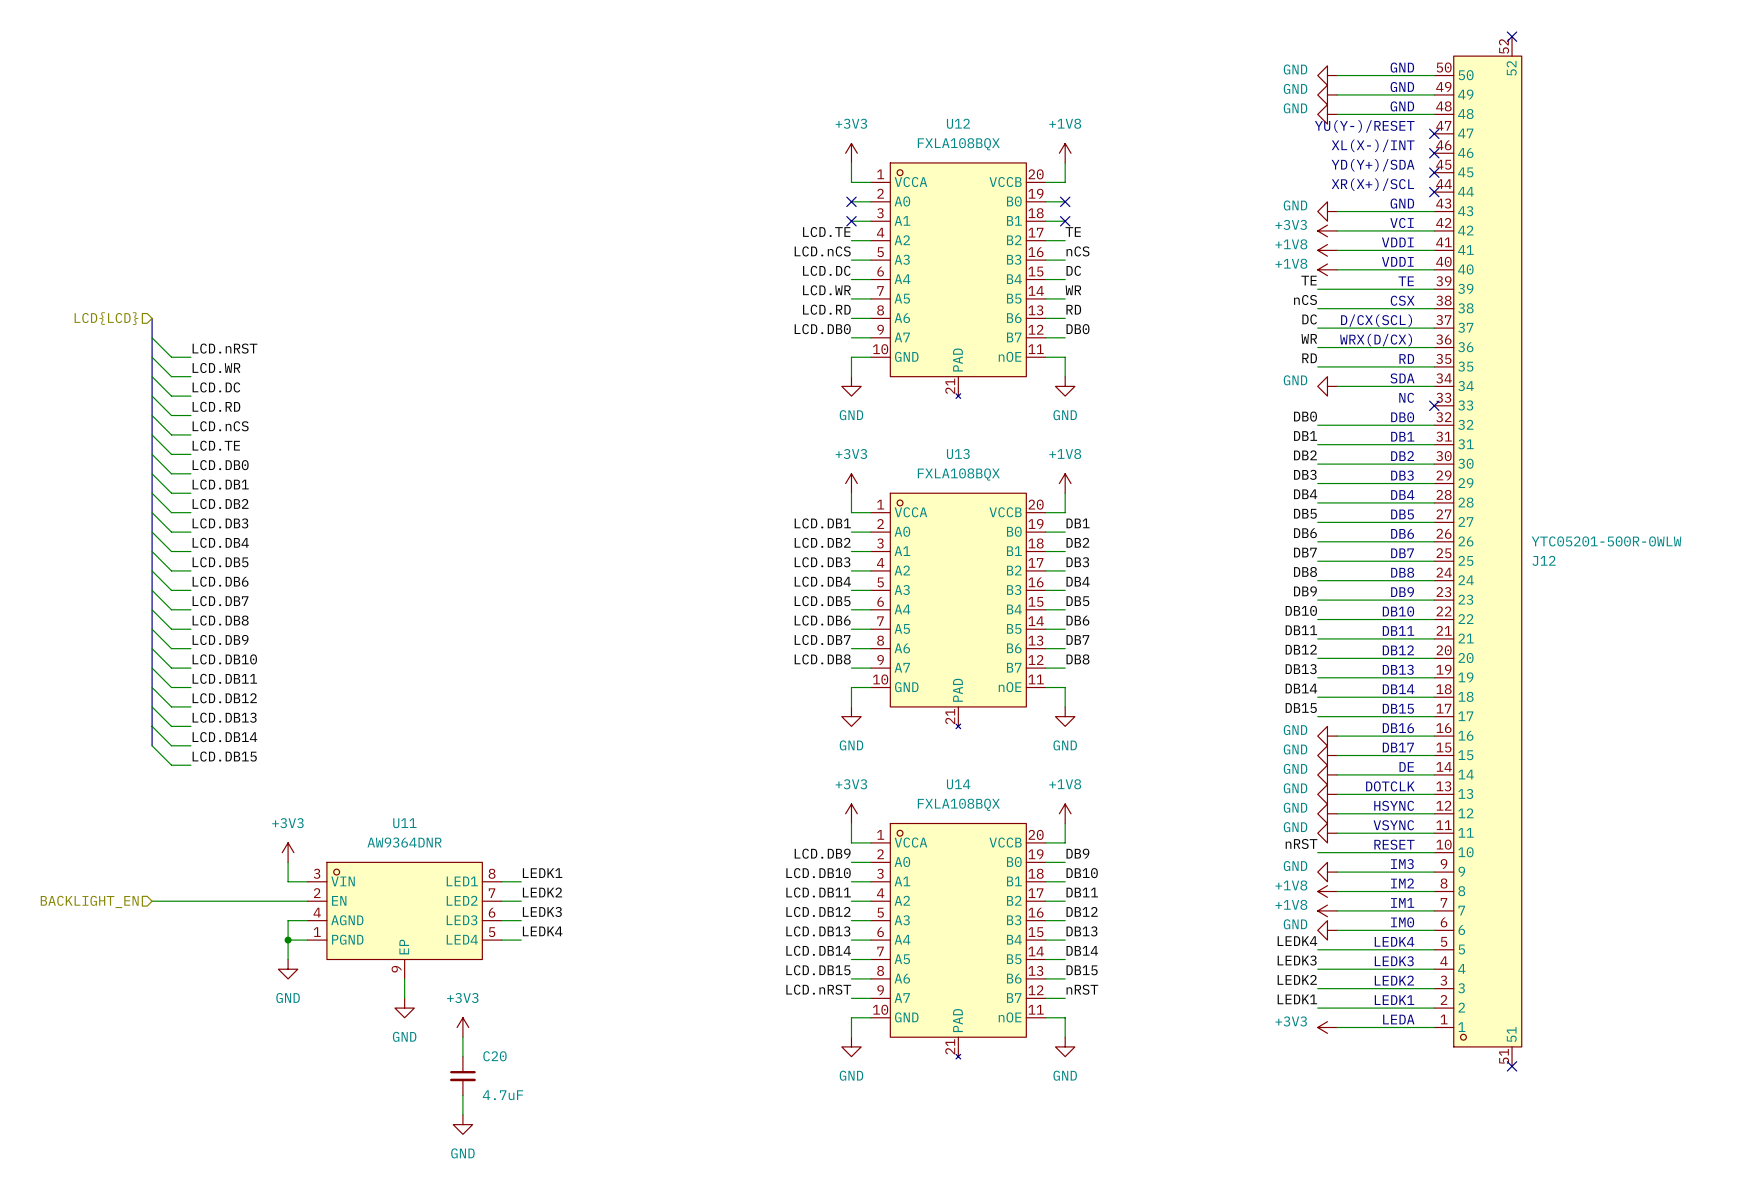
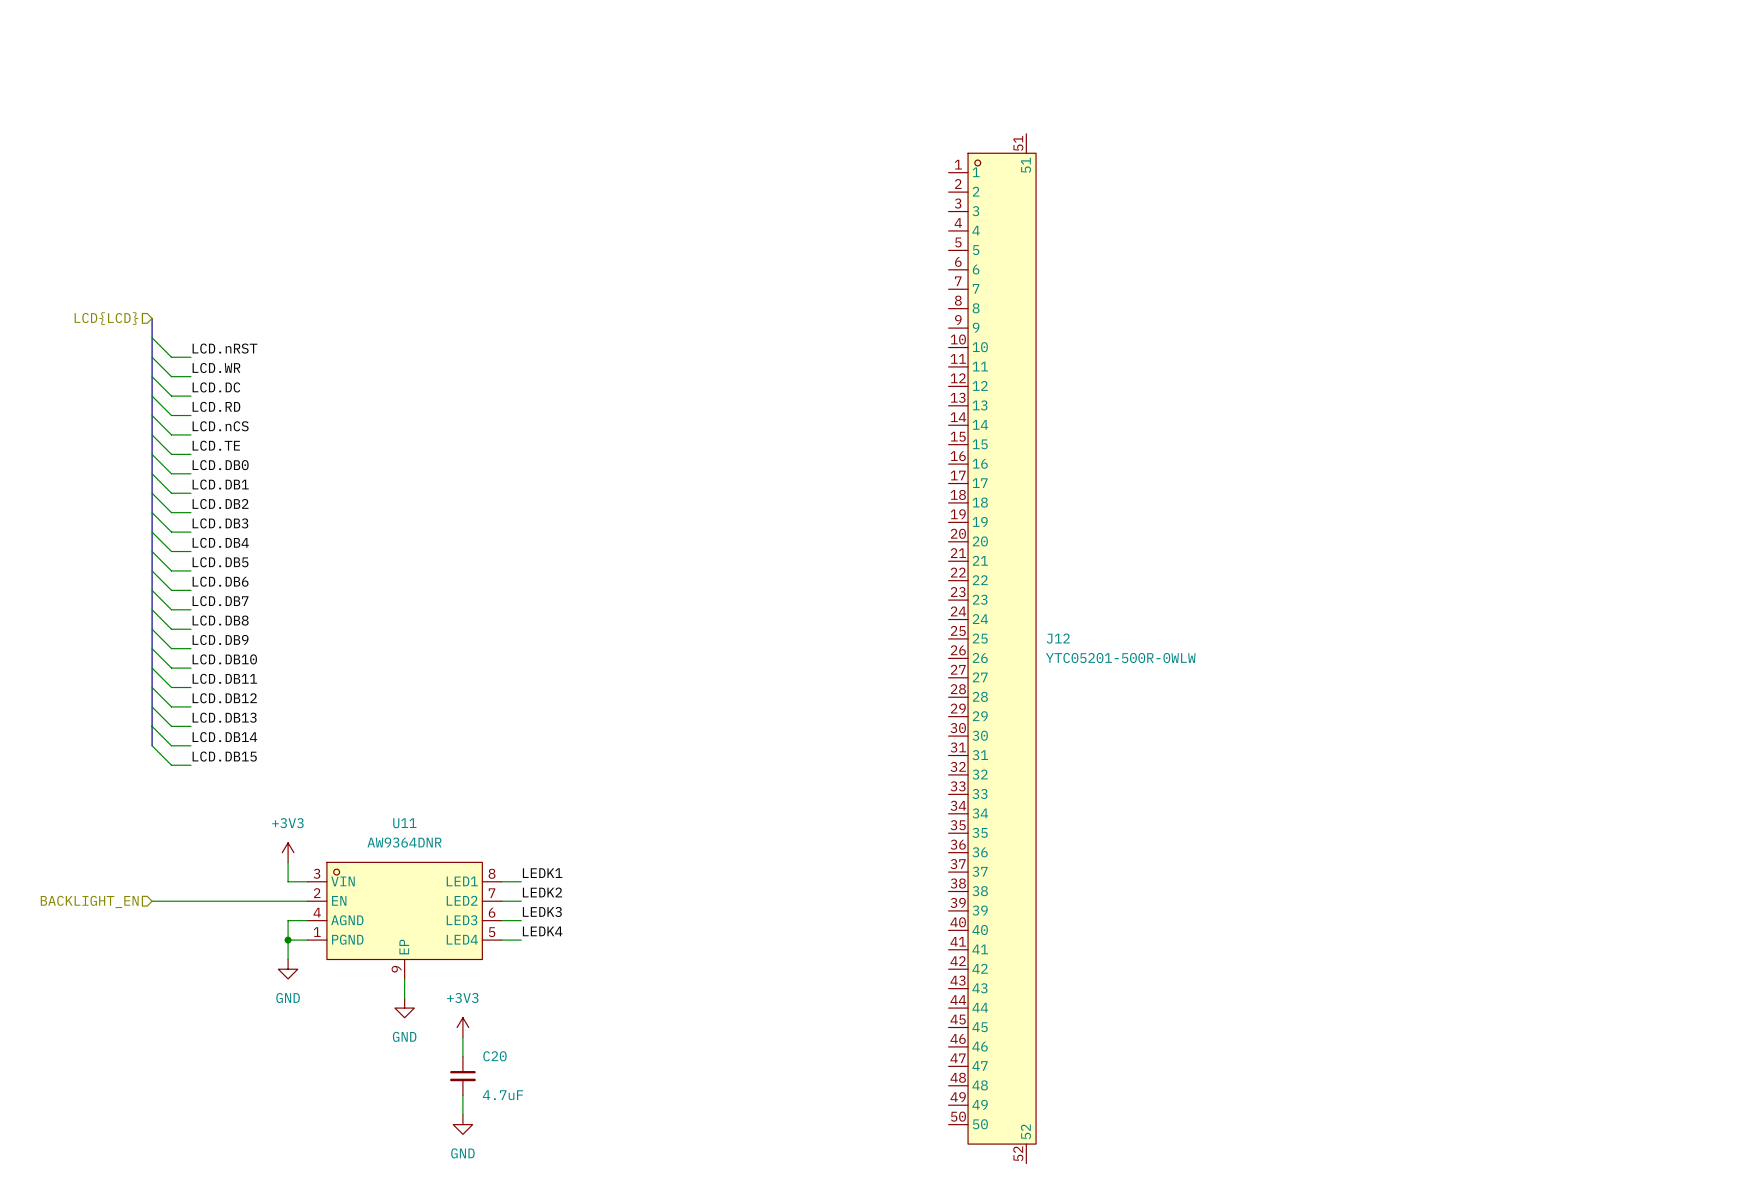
no-connect mark: (1512, 36) -> none
text: GND (1402, 67) -> none
power symbol: GND (1327, 75) -> none
wire: (1337, 75) (1434, 75) -> none
text: GND (1402, 87) -> none
power symbol: GND (1327, 94) -> none
wire: (1337, 94) (1434, 94) -> none
text: GND (1402, 106) -> none
power symbol: GND (1327, 114) -> none
wire: (1337, 114) (1434, 114) -> none
text: YU(Y-)/RESET (1364, 126) -> none
no-connect mark: (1434, 133) -> none
text: XL(X-)/INT (1373, 145) -> none
power symbol: +3V3 (851, 153) -> none
power symbol: +1V8 (1065, 153) -> none
no-connect mark: (1434, 153) -> none
wire: (851, 162) (851, 182) (870, 182) -> none
wire: (1065, 162) (1065, 182) (1045, 182) -> none
text: YD(Y+)/SDA (1373, 165) -> none
no-connect mark: (1434, 172) -> none
text: XR(X+)/SCL (1372, 184) -> none
no-connect mark: (1434, 192) -> none
wire: (851, 201) (870, 201) -> none
no-connect mark: (851, 201) -> none
wire: (1045, 201) (1065, 201) -> none
no-connect mark: (1065, 201) -> none
text: GND (1402, 203) -> none
power symbol: GND (1327, 211) -> none
wire: (1337, 211) (1434, 211) -> none
wire: (851, 221) (870, 221) -> none
no-connect mark: (851, 221) -> none
wire: (1045, 221) (1065, 221) -> none
no-connect mark: (1065, 221) -> none
text: VCI (1402, 223) -> none
power symbol: +3V3 (1327, 230) -> none
wire: (1337, 230) (1434, 230) -> none
label: LCD.TE (826, 232) -> none
label: TE (1073, 232) -> none
wire: (851, 240) (870, 240) -> none
wire: (1045, 240) (1065, 240) -> none
text: VDDI (1397, 242) -> none
power symbol: +1V8 (1327, 250) -> none
wire: (1337, 250) (1434, 250) -> none
label: LCD.nCS (822, 251) -> none
label: nCS (1077, 251) -> none
wire: (851, 260) (870, 260) -> none
wire: (1045, 260) (1065, 260) -> none
text: VDDI (1397, 261) -> none
power symbol: +1V8 (1327, 269) -> none
wire: (1337, 269) (1434, 269) -> none
label: LCD.DC (826, 270) -> none
label: DC (1073, 270) -> none
wire: (851, 279) (870, 279) -> none
wire: (1045, 279) (1065, 279) -> none
U12: FXLA108BQX (958, 280) -> none
label: TE (1309, 280) -> none
text: TE (1406, 281) -> none
wire: (1317, 289) (1434, 289) -> none
label: LCD.WR (826, 290) -> none
label: WR (1073, 290) -> none
wire: (851, 298) (870, 298) -> none
wire: (1045, 298) (1065, 298) -> none
label: nCS (1305, 300) -> none
text: CSX (1402, 300) -> none
wire: (1317, 308) (1434, 308) -> none
label: LCD.RD (826, 309) -> none
label: RD (1073, 309) -> none
wire: (851, 318) (870, 318) -> none
wire: (1045, 318) (1065, 318) -> none
label: DC (1309, 319) -> none
text: D/CX(SCL) (1376, 320) -> none
wire: (1317, 328) (1434, 328) -> none
label: LCD.DB0 (822, 329) -> none
label: DB0 (1077, 329) -> none
wire: (851, 337) (870, 337) -> none
wire: (1045, 337) (1065, 337) -> none
label: WR (1309, 338) -> none
text: WRX(D/CX) (1376, 340) -> none
wire: (1317, 347) (1434, 347) -> none
wire: (870, 357) (851, 357) (851, 376) -> none
wire: (1045, 357) (1065, 357) (1065, 376) -> none
label: RD (1309, 358) -> none
text: RD (1406, 359) -> none
wire: (1317, 366) (1434, 366) -> none
text: SDA (1402, 378) -> none
power symbol: GND (851, 386) -> none
power symbol: GND (1065, 386) -> none
power symbol: GND (1327, 386) -> none
wire: (1337, 386) (1434, 386) -> none
text: NC (1406, 397) -> none
no-connect mark: (1434, 405) -> none
label: DB0 (1305, 416) -> none
text: DB0 (1402, 417) -> none
wire: (1317, 425) (1434, 425) -> none
label: DB1 (1305, 436) -> none
text: DB1 (1402, 436) -> none
wire: (1317, 444) (1434, 444) -> none
label: DB2 (1305, 455) -> none
text: DB2 (1402, 456) -> none
wire: (1317, 464) (1434, 464) -> none
label: DB3 (1305, 474) -> none
text: DB3 (1402, 475) -> none
power symbol: +3V3 (851, 483) -> none
power symbol: +1V8 (1065, 483) -> none
wire: (1317, 483) (1434, 483) -> none
wire: (851, 493) (851, 512) (870, 512) -> none
wire: (1065, 493) (1065, 512) (1045, 512) -> none
label: DB4 (1305, 494) -> none
text: DB4 (1402, 494) -> none
wire: (1317, 502) (1434, 502) -> none
label: DB5 (1305, 513) -> none
text: DB5 (1402, 514) -> none
wire: (1317, 522) (1434, 522) -> none
label: LCD.DB1 (822, 523) -> none
label: DB1 (1078, 523) -> none
wire: (851, 532) (870, 532) -> none
wire: (1045, 532) (1065, 532) -> none
label: DB6 (1305, 533) -> none
text: DB6 (1402, 533) -> none
wire: (1317, 541) (1434, 541) -> none
label: LCD.DB2 (822, 542) -> none
label: DB2 (1077, 542) -> none
wire: (851, 551) (870, 551) -> none
wire: (1045, 551) (1065, 551) -> none
J12 flip: as is (1487, 551) -> up-down (1002, 648)
label: DB7 (1305, 552) -> none
text: DB7 (1402, 553) -> none
wire: (1317, 561) (1434, 561) -> none
label: LCD.DB3 (822, 562) -> none
label: DB3 (1077, 562) -> none
wire: (851, 570) (870, 570) -> none
wire: (1045, 570) (1065, 570) -> none
label: DB8 (1305, 571) -> none
text: DB8 (1402, 572) -> none
wire: (1317, 580) (1434, 580) -> none
label: LCD.DB4 (822, 581) -> none
label: DB4 (1078, 581) -> none
wire: (851, 590) (870, 590) -> none
wire: (1045, 590) (1065, 590) -> none
label: DB9 (1305, 591) -> none
text: DB9 (1402, 592) -> none
wire: (1317, 600) (1434, 600) -> none
label: LCD.DB5 (822, 601) -> none
label: DB5 (1077, 601) -> none
wire: (851, 609) (870, 609) -> none
wire: (1045, 609) (1065, 609) -> none
U13: FXLA108BQX (958, 610) -> none
label: DB10 (1301, 610) -> none
text: DB10 (1398, 611) -> none
wire: (1317, 619) (1434, 619) -> none
label: LCD.DB6 (822, 620) -> none
label: DB6 (1077, 620) -> none
wire: (851, 629) (870, 629) -> none
wire: (1045, 629) (1065, 629) -> none
label: DB11 (1301, 630) -> none
text: DB11 (1398, 630) -> none
wire: (1317, 638) (1434, 638) -> none
label: LCD.DB7 (822, 639) -> none
label: DB7 (1077, 639) -> none
wire: (851, 648) (870, 648) -> none
wire: (1045, 648) (1065, 648) -> none
label: DB12 (1301, 649) -> none
text: DB12 (1398, 650) -> none
wire: (1317, 658) (1434, 658) -> none
label: LCD.DB8 (822, 659) -> none
label: DB8 (1077, 659) -> none
wire: (851, 668) (870, 668) -> none
wire: (1045, 668) (1065, 668) -> none
label: DB13 (1301, 669) -> none
text: DB13 (1398, 669) -> none
wire: (1317, 677) (1434, 677) -> none
wire: (870, 687) (851, 687) (851, 706) -> none
wire: (1045, 687) (1065, 687) (1065, 706) -> none
label: DB14 (1301, 688) -> none
text: DB14 (1398, 689) -> none
wire: (1317, 697) (1434, 697) -> none
label: DB15 (1301, 708) -> none
text: DB15 (1398, 708) -> none
power symbol: GND (851, 716) -> none
power symbol: GND (1065, 716) -> none
wire: (1317, 716) (1434, 716) -> none
text: DB16 (1398, 728) -> none
power symbol: GND (1327, 736) -> none
wire: (1337, 736) (1434, 736) -> none
text: DB17 (1398, 747) -> none
power symbol: GND (1327, 755) -> none
wire: (1337, 755) (1434, 755) -> none
text: DE (1406, 766) -> none
power symbol: GND (1327, 774) -> none
wire: (1337, 774) (1434, 774) -> none
text: DOTCLK (1390, 786) -> none
power symbol: GND (1327, 794) -> none
wire: (1337, 794) (1434, 794) -> none
text: HSYNC (1394, 805) -> none
power symbol: +3V3 (851, 813) -> none
power symbol: +1V8 (1065, 813) -> none
power symbol: GND (1327, 813) -> none
wire: (1337, 813) (1434, 813) -> none
wire: (851, 823) (851, 842) (870, 842) -> none
wire: (1065, 823) (1065, 842) (1045, 842) -> none
text: VSYNC (1393, 825) -> none
power symbol: GND (1327, 833) -> none
wire: (1337, 833) (1434, 833) -> none
label: nRST (1301, 843) -> none
text: RESET (1394, 844) -> none
wire: (1317, 852) (1434, 852) -> none
label: LCD.DB9 (822, 853) -> none
label: DB9 (1077, 853) -> none
wire: (851, 862) (870, 862) -> none
wire: (1045, 862) (1065, 862) -> none
text: IM3 (1402, 864) -> none
power symbol: GND (1327, 872) -> none
wire: (1337, 872) (1434, 872) -> none
label: LCD.DB10 (818, 873) -> none
label: DB10 (1082, 873) -> none
wire: (851, 881) (870, 881) -> none
wire: (1045, 881) (1065, 881) -> none
text: IM2 (1402, 883) -> none
power symbol: +1V8 (1327, 891) -> none
wire: (1337, 891) (1434, 891) -> none
label: LCD.DB11 (818, 892) -> none
label: DB11 (1082, 892) -> none
wire: (851, 901) (870, 901) -> none
wire: (1045, 901) (1065, 901) -> none
text: IM1 (1402, 902) -> none
power symbol: +1V8 (1327, 910) -> none
wire: (1337, 910) (1434, 910) -> none
label: LCD.DB12 (818, 911) -> none
label: DB12 (1082, 911) -> none
wire: (851, 920) (870, 920) -> none
wire: (1045, 920) (1065, 920) -> none
text: IM0 (1402, 922) -> none
power symbol: GND (1327, 930) -> none
wire: (1337, 930) (1434, 930) -> none
label: LCD.DB13 (818, 931) -> none
label: DB13 (1081, 931) -> none
wire: (851, 940) (870, 940) -> none
wire: (1045, 940) (1065, 940) -> none
U14: FXLA108BQX (958, 941) -> none
label: LEDK4 (1297, 941) -> none
text: LEDK4 (1394, 941) -> none
wire: (1317, 949) (1434, 949) -> none
label: LCD.DB14 (818, 950) -> none
label: DB14 (1082, 950) -> none
wire: (851, 959) (870, 959) -> none
wire: (1045, 959) (1065, 959) -> none
label: LEDK3 (1297, 960) -> none
text: LEDK3 (1394, 961) -> none
wire: (1317, 969) (1434, 969) -> none
label: LCD.DB15 (818, 970) -> none
label: DB15 (1082, 970) -> none
wire: (851, 978) (870, 978) -> none
wire: (1045, 978) (1065, 978) -> none
label: LEDK2 (1297, 979) -> none
text: LEDK2 (1394, 980) -> none
wire: (1317, 988) (1434, 988) -> none
label: LCD.nRST (818, 989) -> none
label: nRST (1082, 989) -> none
wire: (851, 998) (870, 998) -> none
wire: (1045, 998) (1065, 998) -> none
label: LEDK1 (1297, 999) -> none
text: LEDK1 (1394, 1000) -> none
wire: (1317, 1008) (1434, 1008) -> none
wire: (870, 1017) (851, 1017) (851, 1037) -> none
wire: (1045, 1017) (1065, 1017) (1065, 1037) -> none
text: LEDA (1398, 1019) -> none
power symbol: +3V3 (1327, 1027) -> none
wire: (1337, 1027) (1434, 1027) -> none
power symbol: GND (851, 1046) -> none
power symbol: GND (1065, 1046) -> none
no-connect mark: (1512, 1066) -> none

